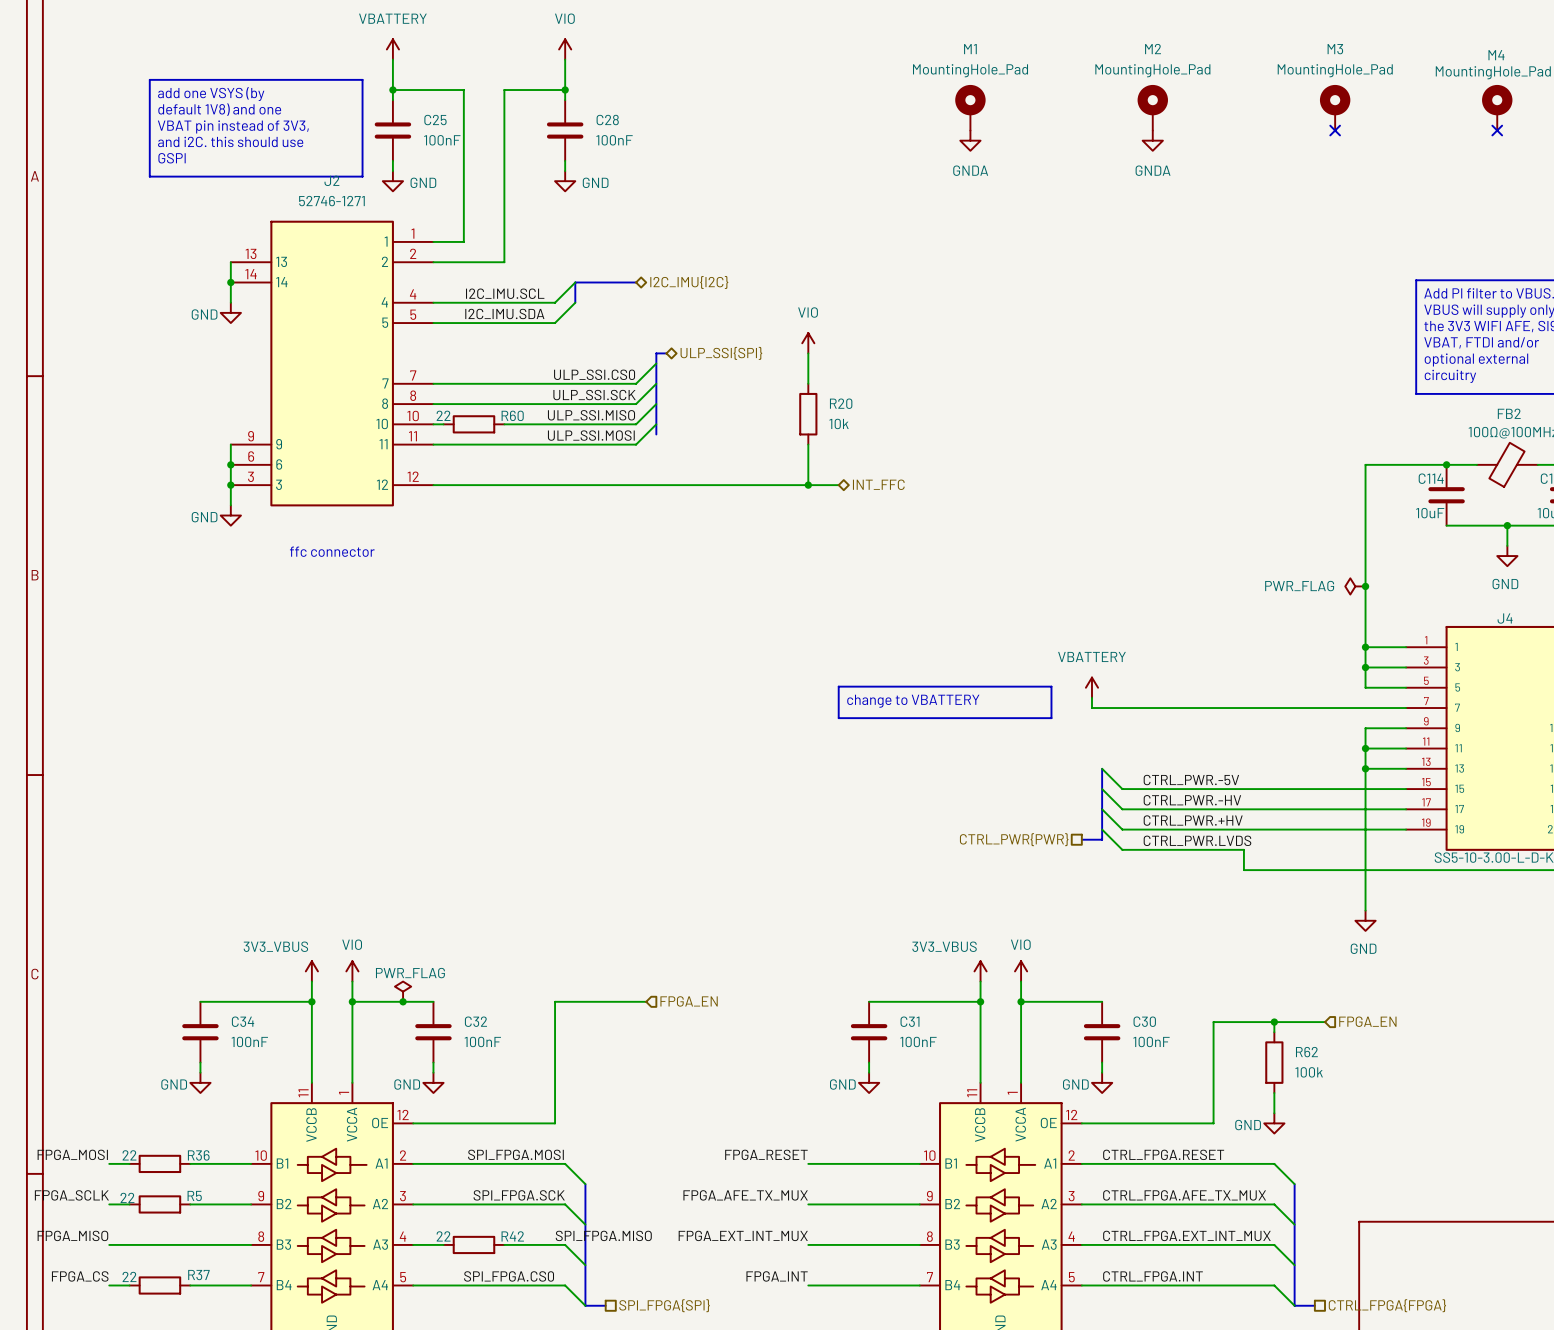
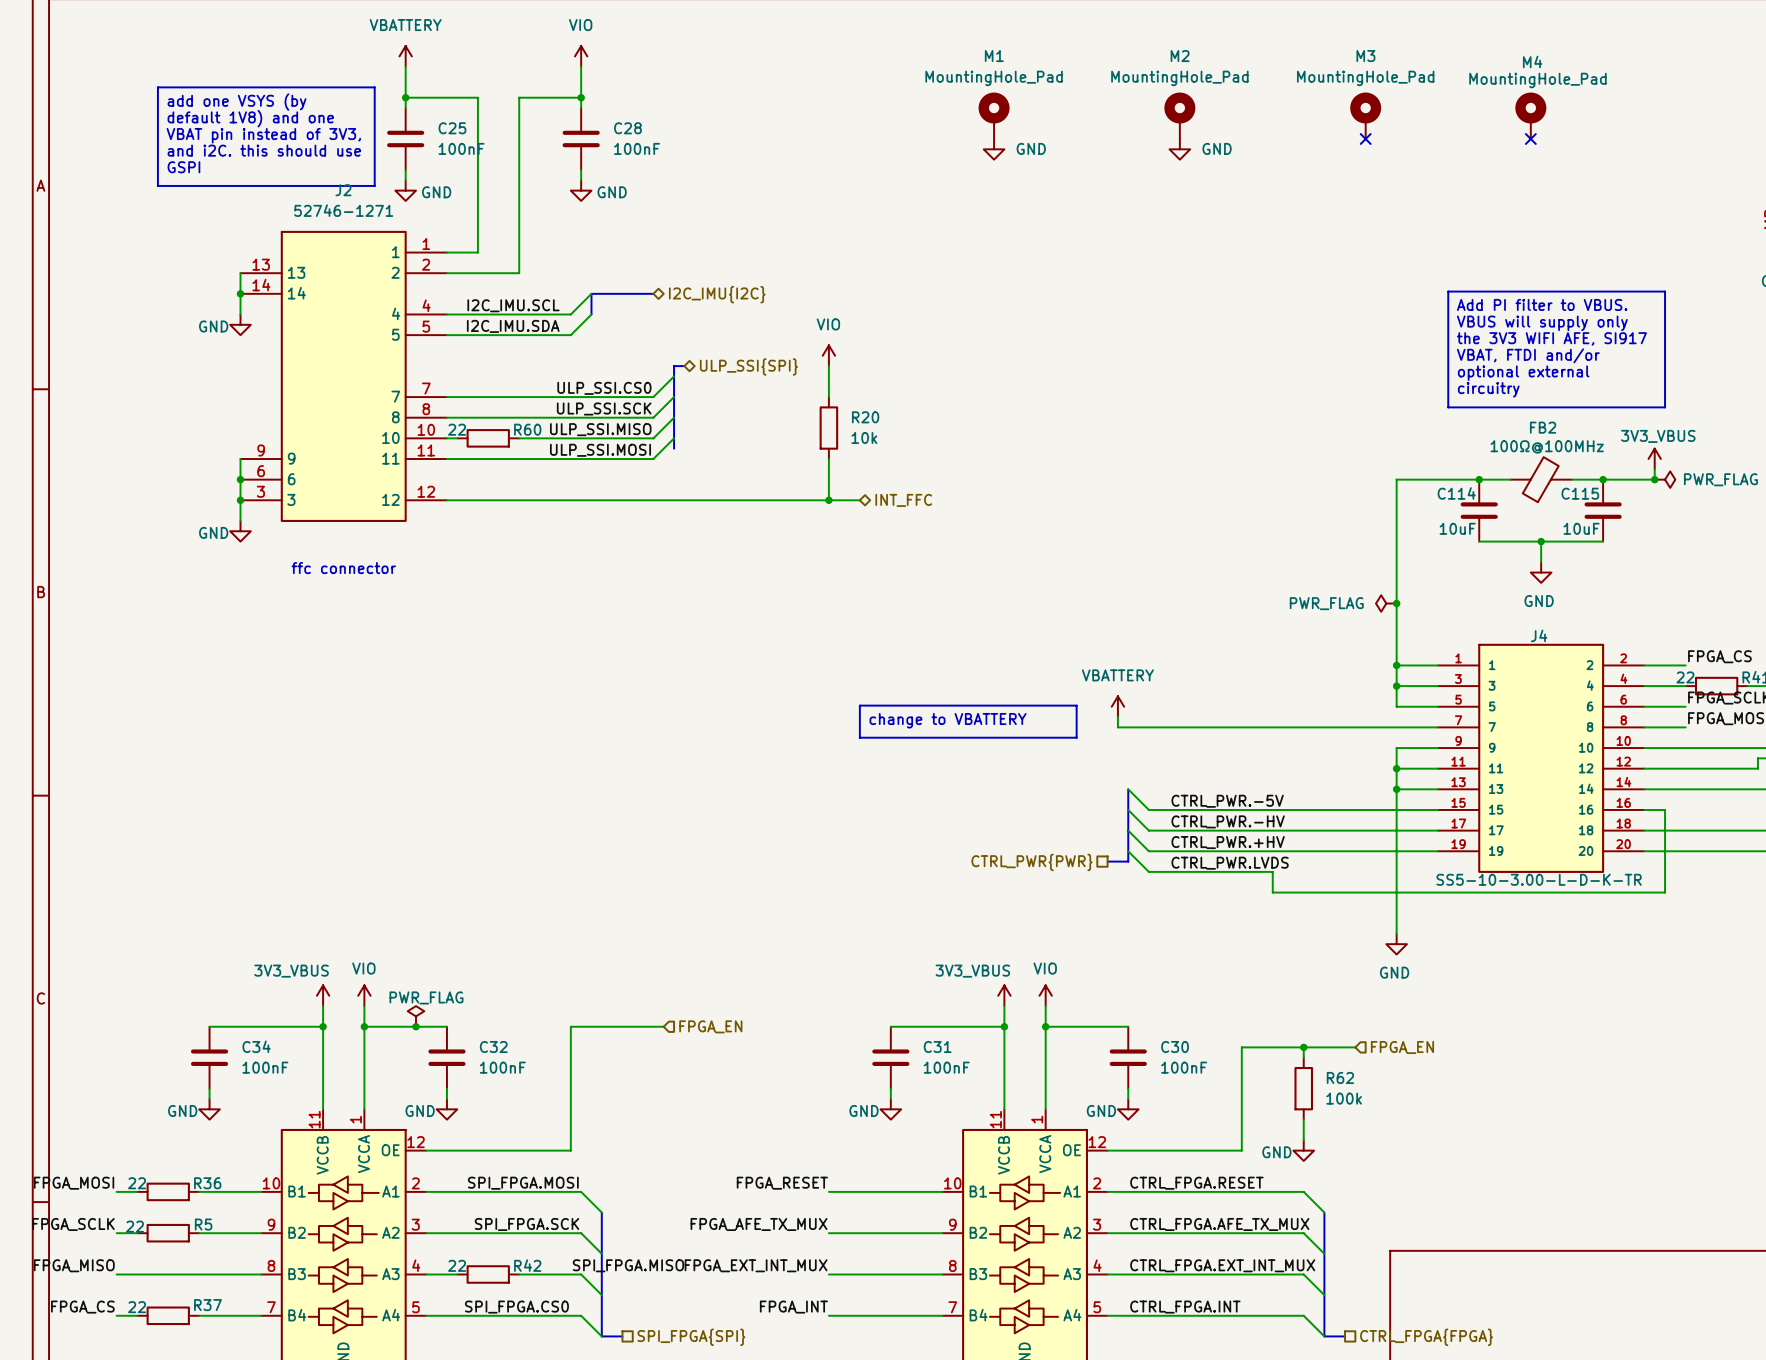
power symbol: GNDA (970, 140) -> GND (994, 149)
power symbol: GNDA (1152, 140) -> GND (1179, 149)

